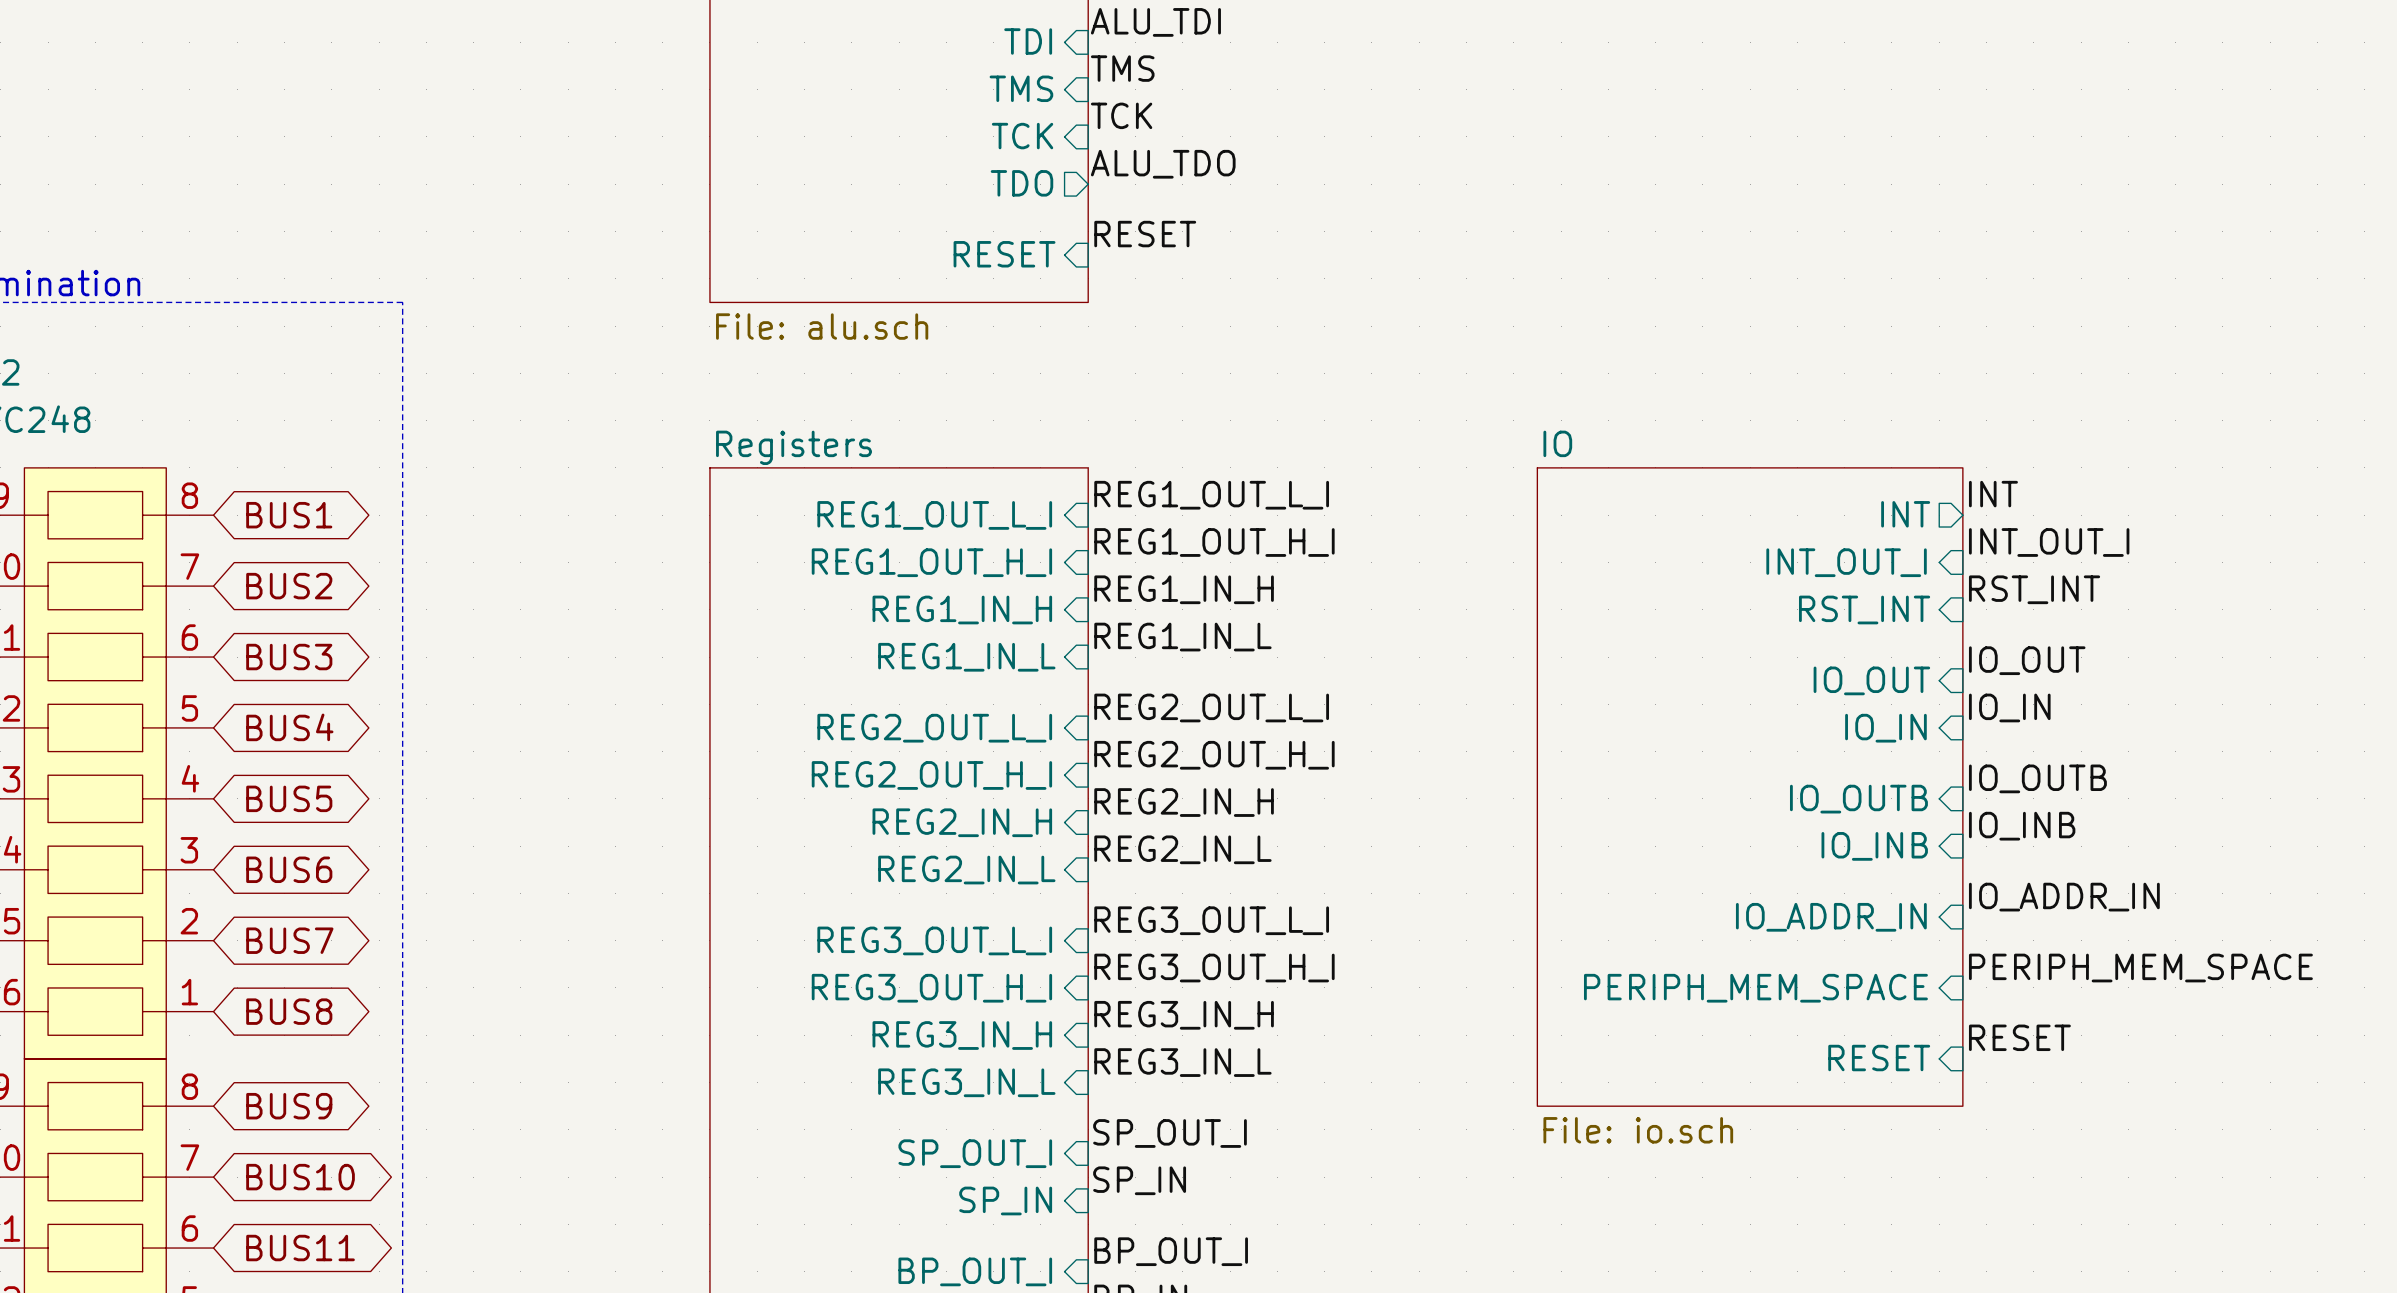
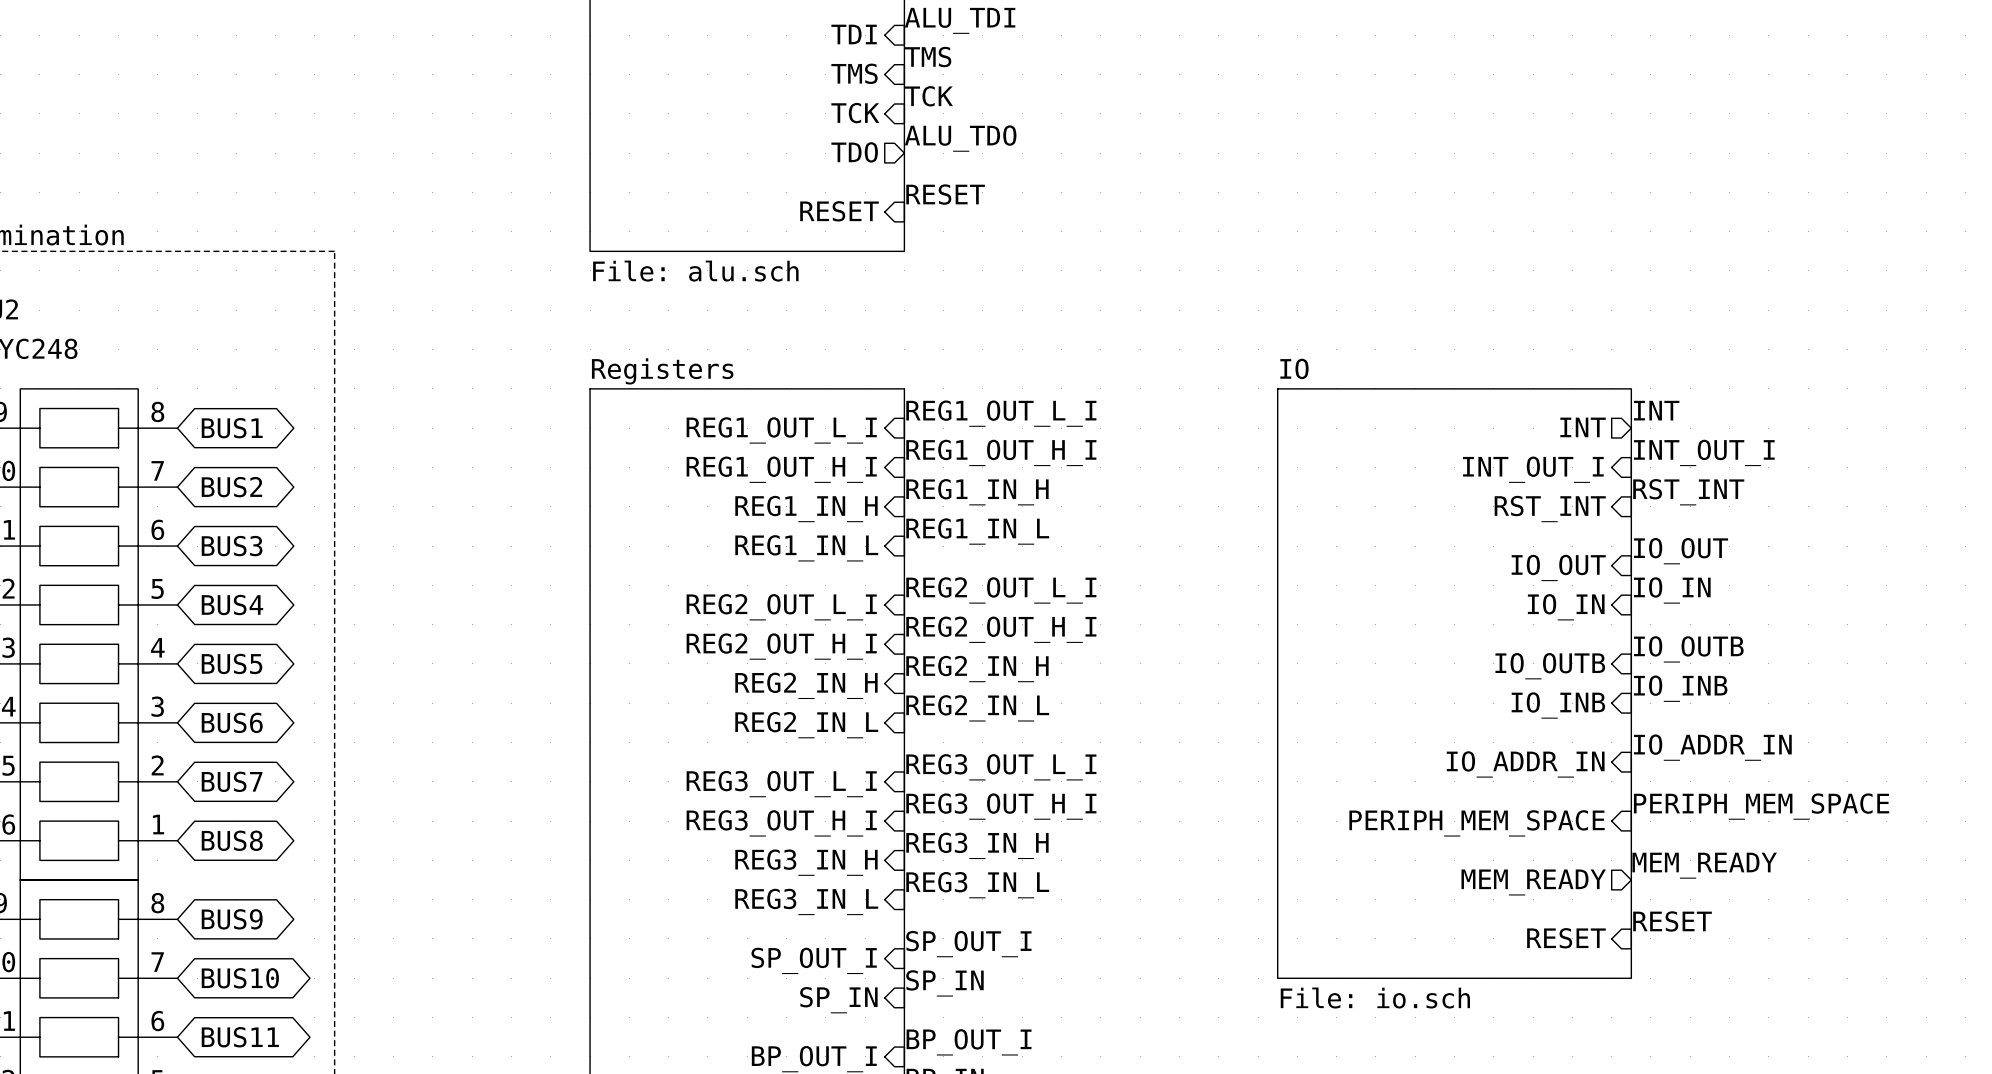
sheet IO: File: io.sch (1750, 787) -> none
sheet IO: none -> File: io.sch (1454, 683)
label: RESET (2019, 1037) -> MEM_READY (1704, 865)
sheet pin shape: input (1879, 1058) -> output (1533, 882)
sheet pin: RESET (1879, 1058) -> MEM_READY (1533, 882)
label: none -> RESET (1672, 921)
sheet pin: none -> RESET (1566, 938)

